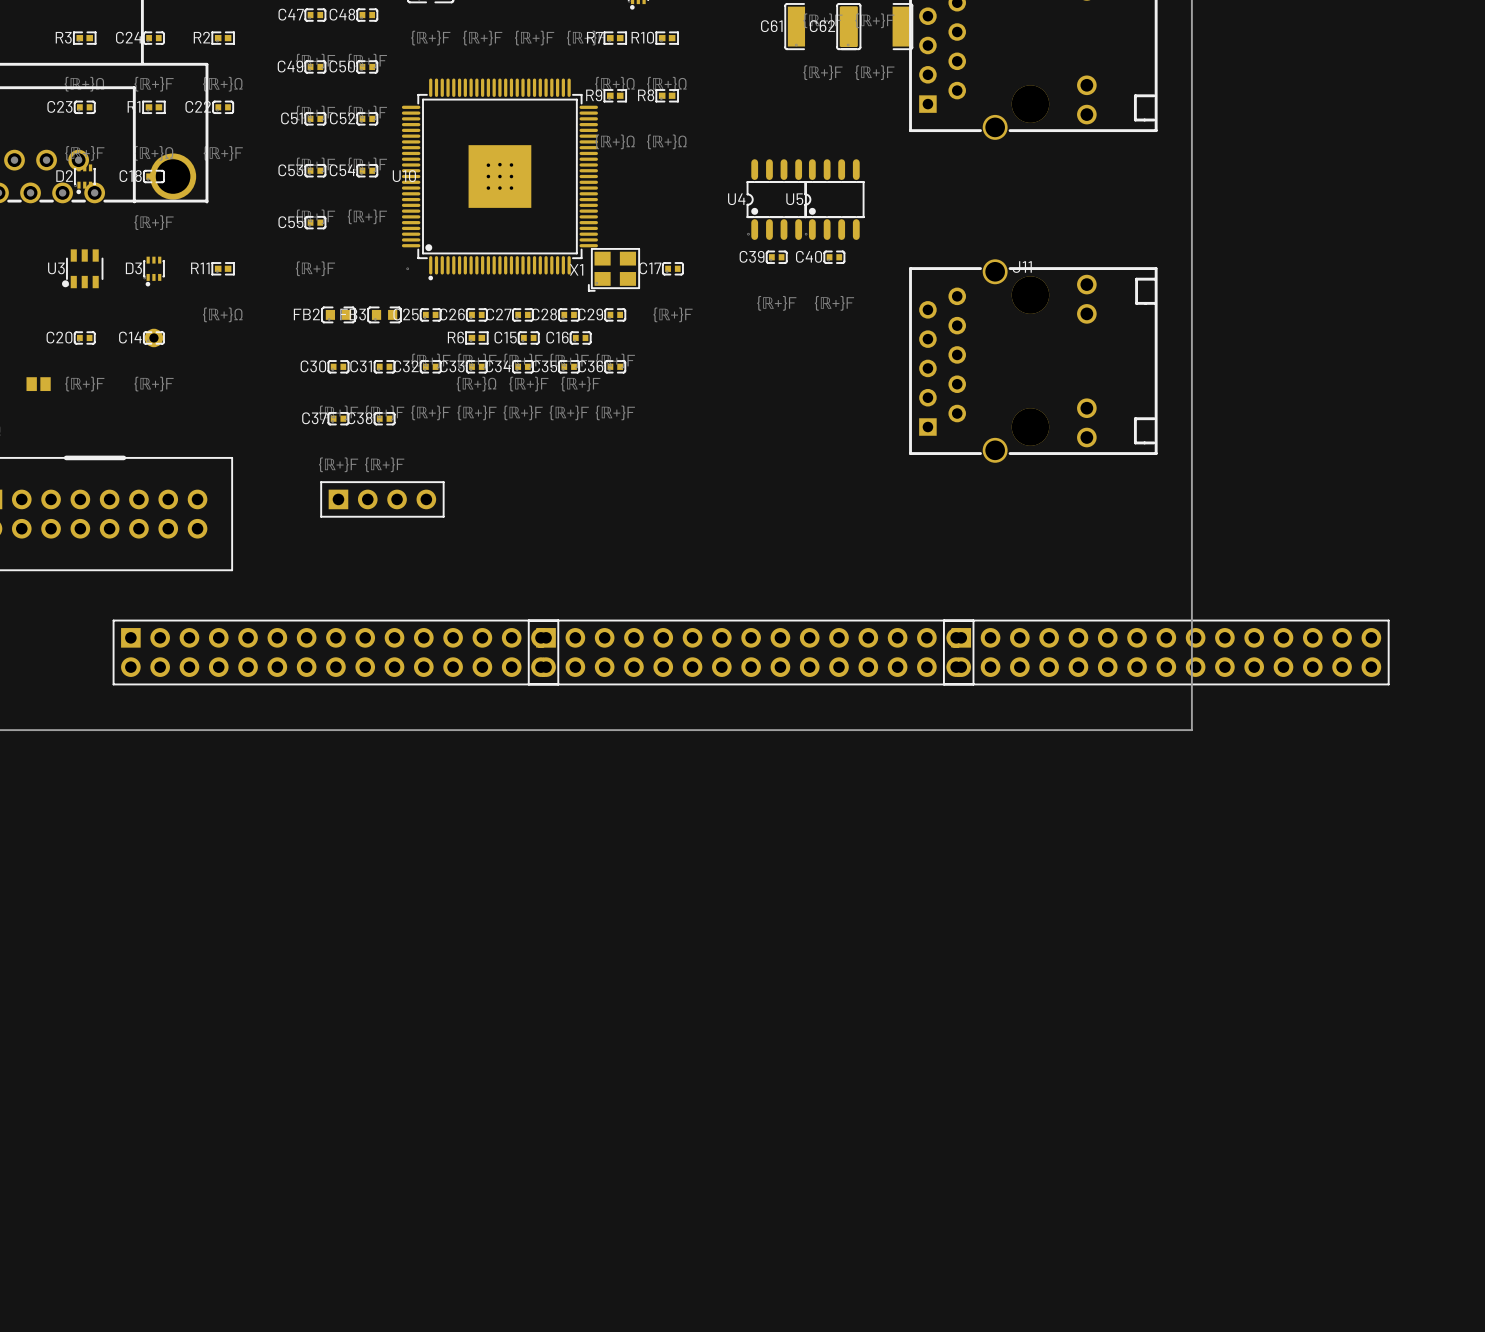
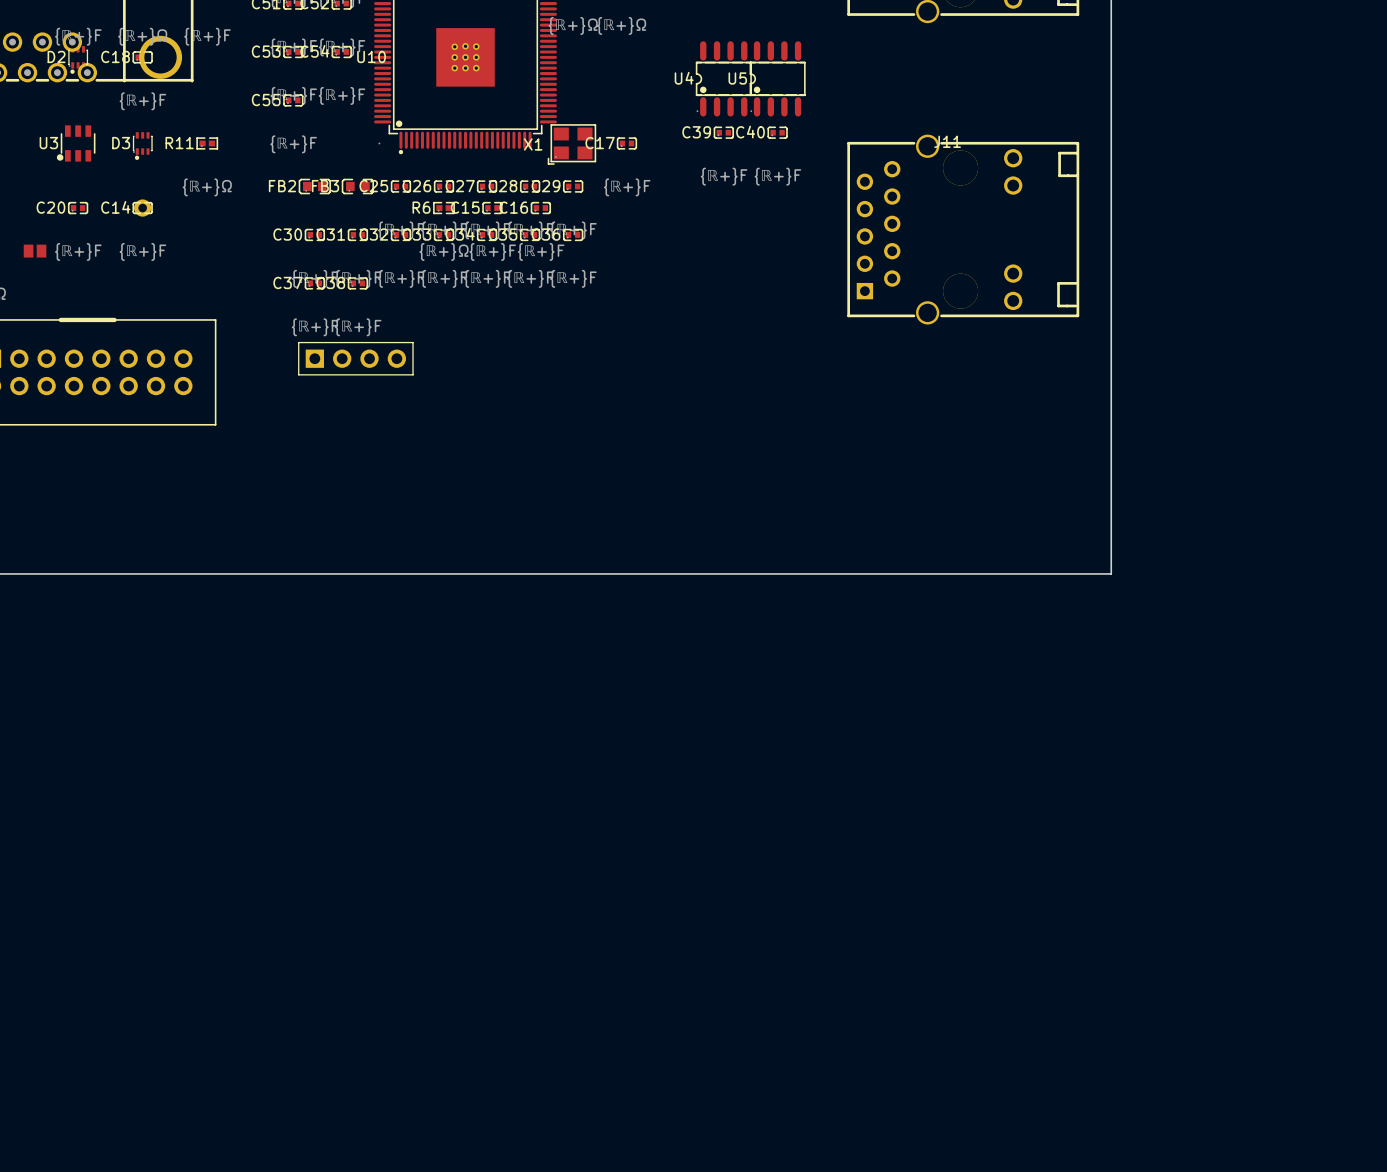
part: (335, 652) -> none
part: (751, 652) -> none
part: (1166, 652) -> none

